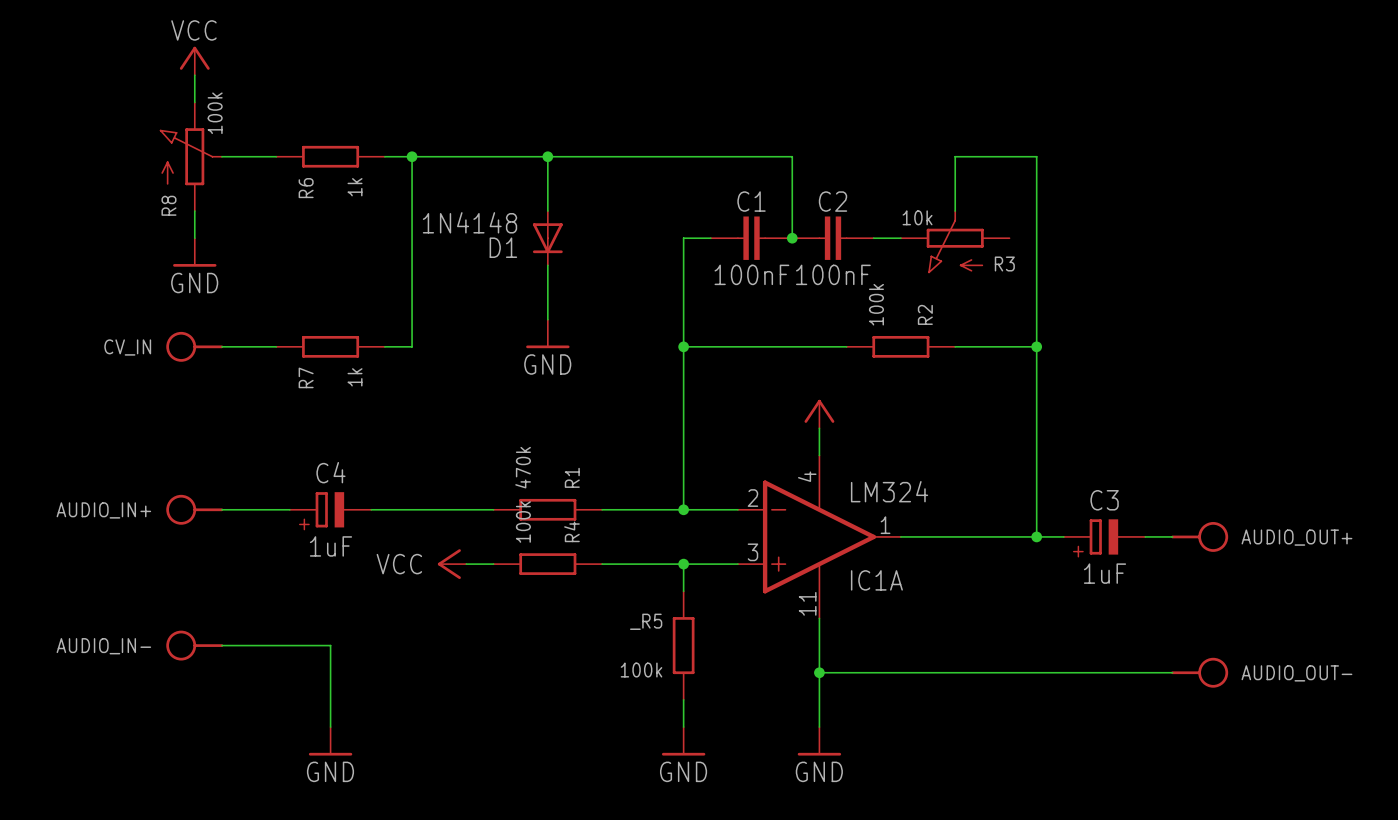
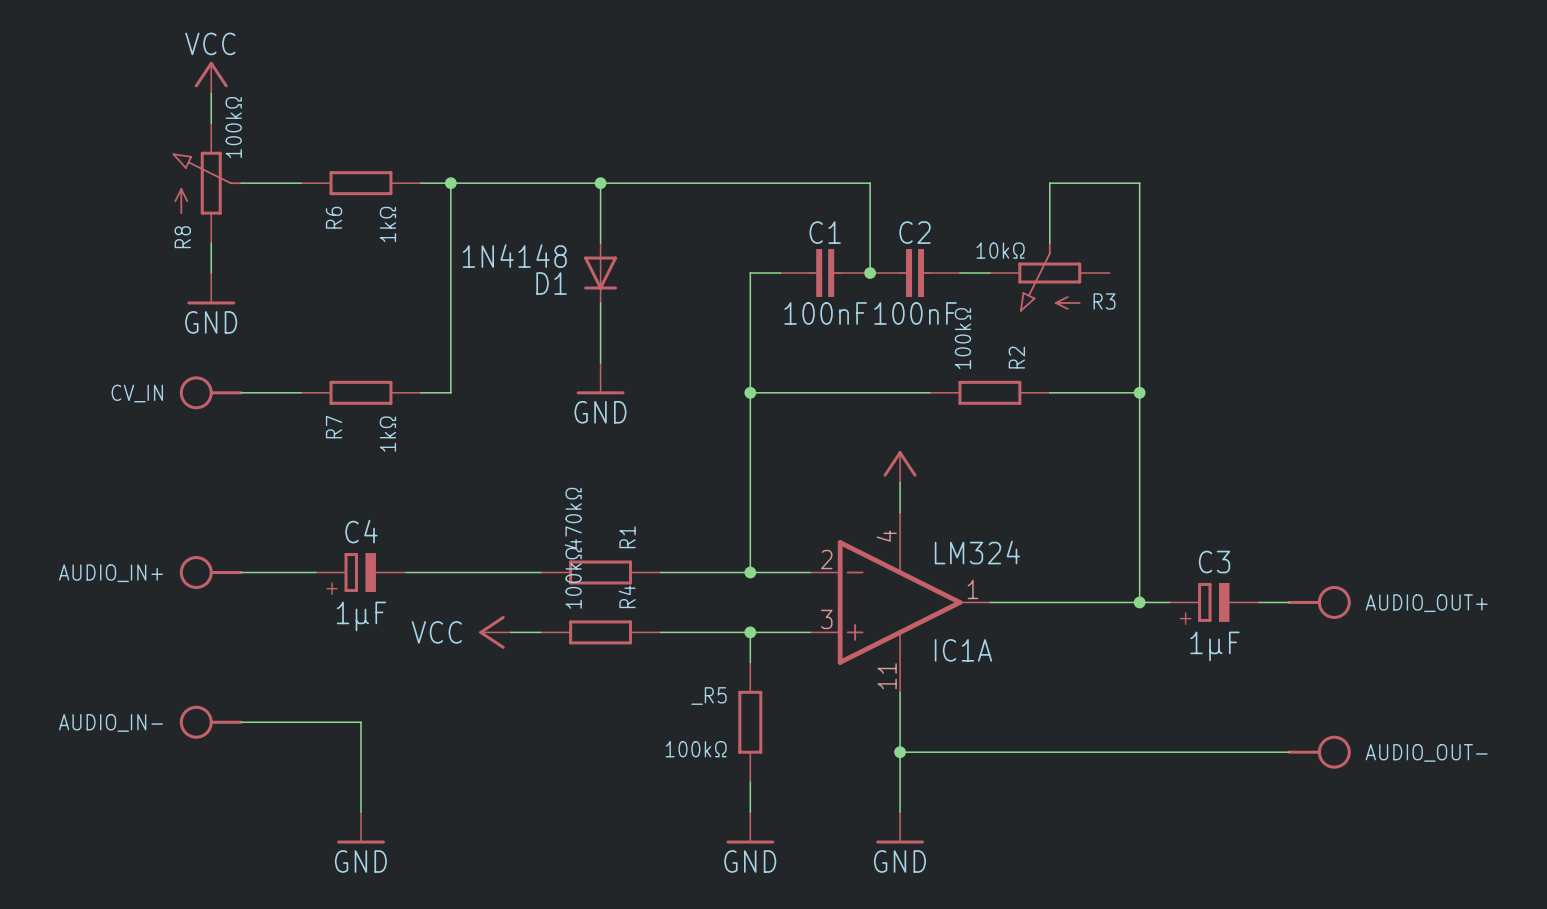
R8 value: 100k (215, 113) -> 100kΩ (233, 127)
R6 value: 1k (355, 187) -> 1kΩ (387, 224)
R3 value: 10k (917, 217) -> 10kΩ (1000, 250)
R2 value: 100k (876, 304) -> 100kΩ (962, 338)
R7 value: 1k (355, 377) -> 1kΩ (387, 434)
R1 value: 470k (523, 467) -> 470kΩ (573, 518)
R4 value: 100k (523, 521) -> 100kΩ (573, 578)
C4 value: 1uF (330, 546) -> 1μF (361, 616)
C3 value: 1uF (1104, 573) -> 1μF (1214, 646)
_R5 value: 100k (641, 670) -> 100kΩ (696, 749)

